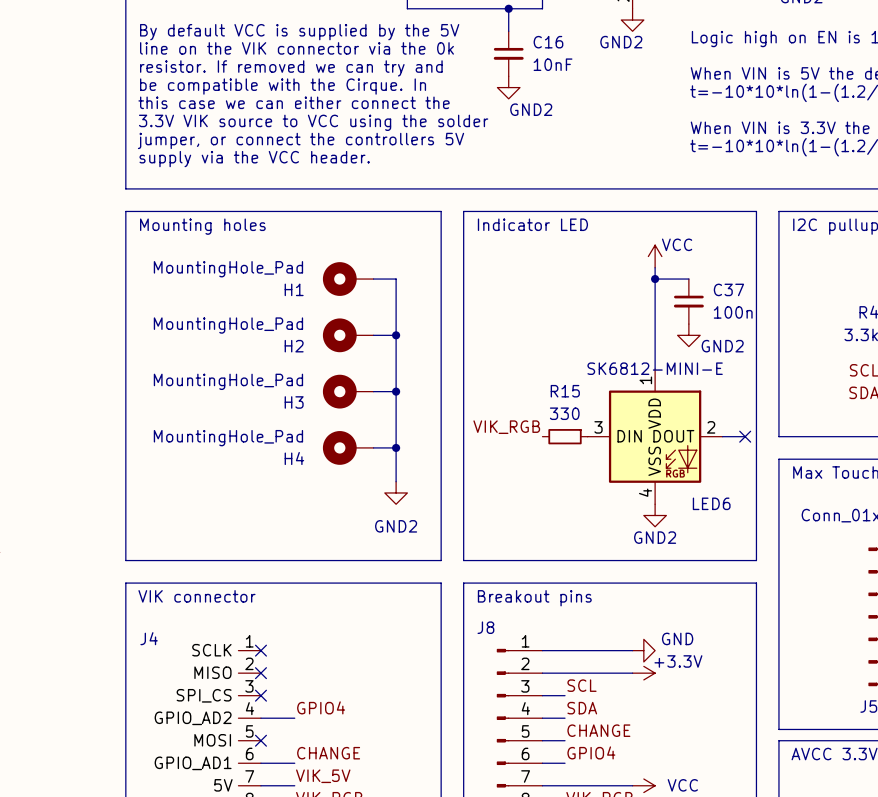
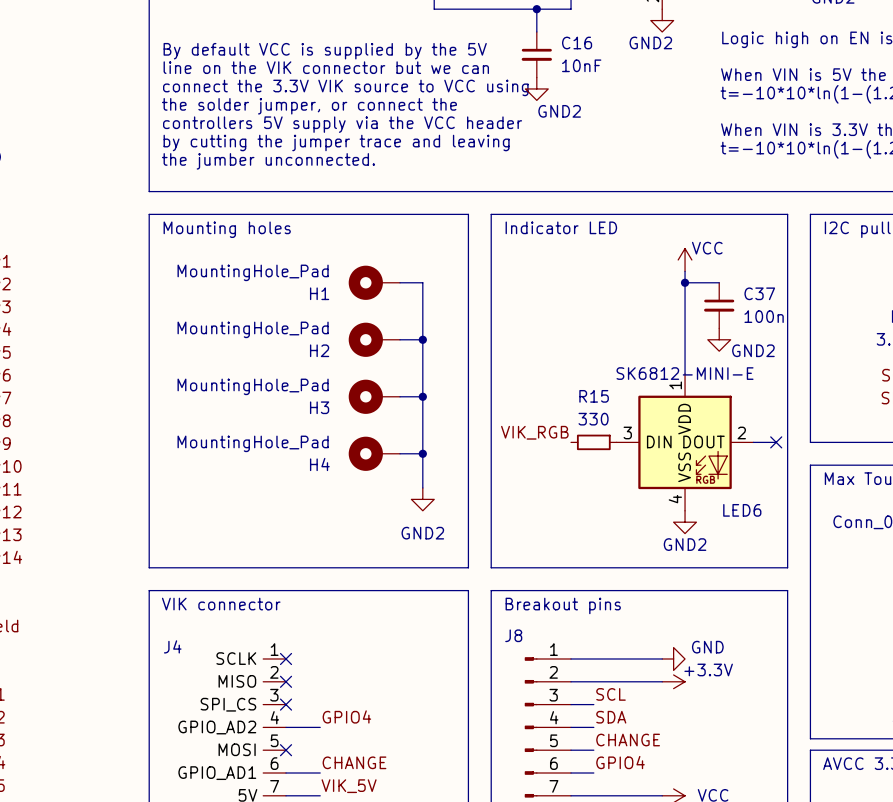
text: By default VCC is supplied by the 5V (299, 32) -> none
text: line on the VIK connector via the 0k (296, 48) -> By default VCC is supplied by the 5V (325, 51)
text: resistor. If removed we can try and (291, 68) -> line on the VIK connector but we can (326, 67)
text: be compatible with the Cirque. In (283, 86) -> connect the 3.3V VIK source to VCC using (345, 87)
text: this case we can either connect the (294, 102) -> the solder jumper, or connect the (309, 106)
text: 3.3V VIK source to VCC using the solder (313, 122) -> controllers 5V supply via the VCC header (342, 124)
text: jumper, or connect the controllers 5V (301, 140) -> by cutting the jumper trace and leaving (336, 142)
text: supply via the VCC header. (254, 159) -> the jumber unconnected. (268, 161)

